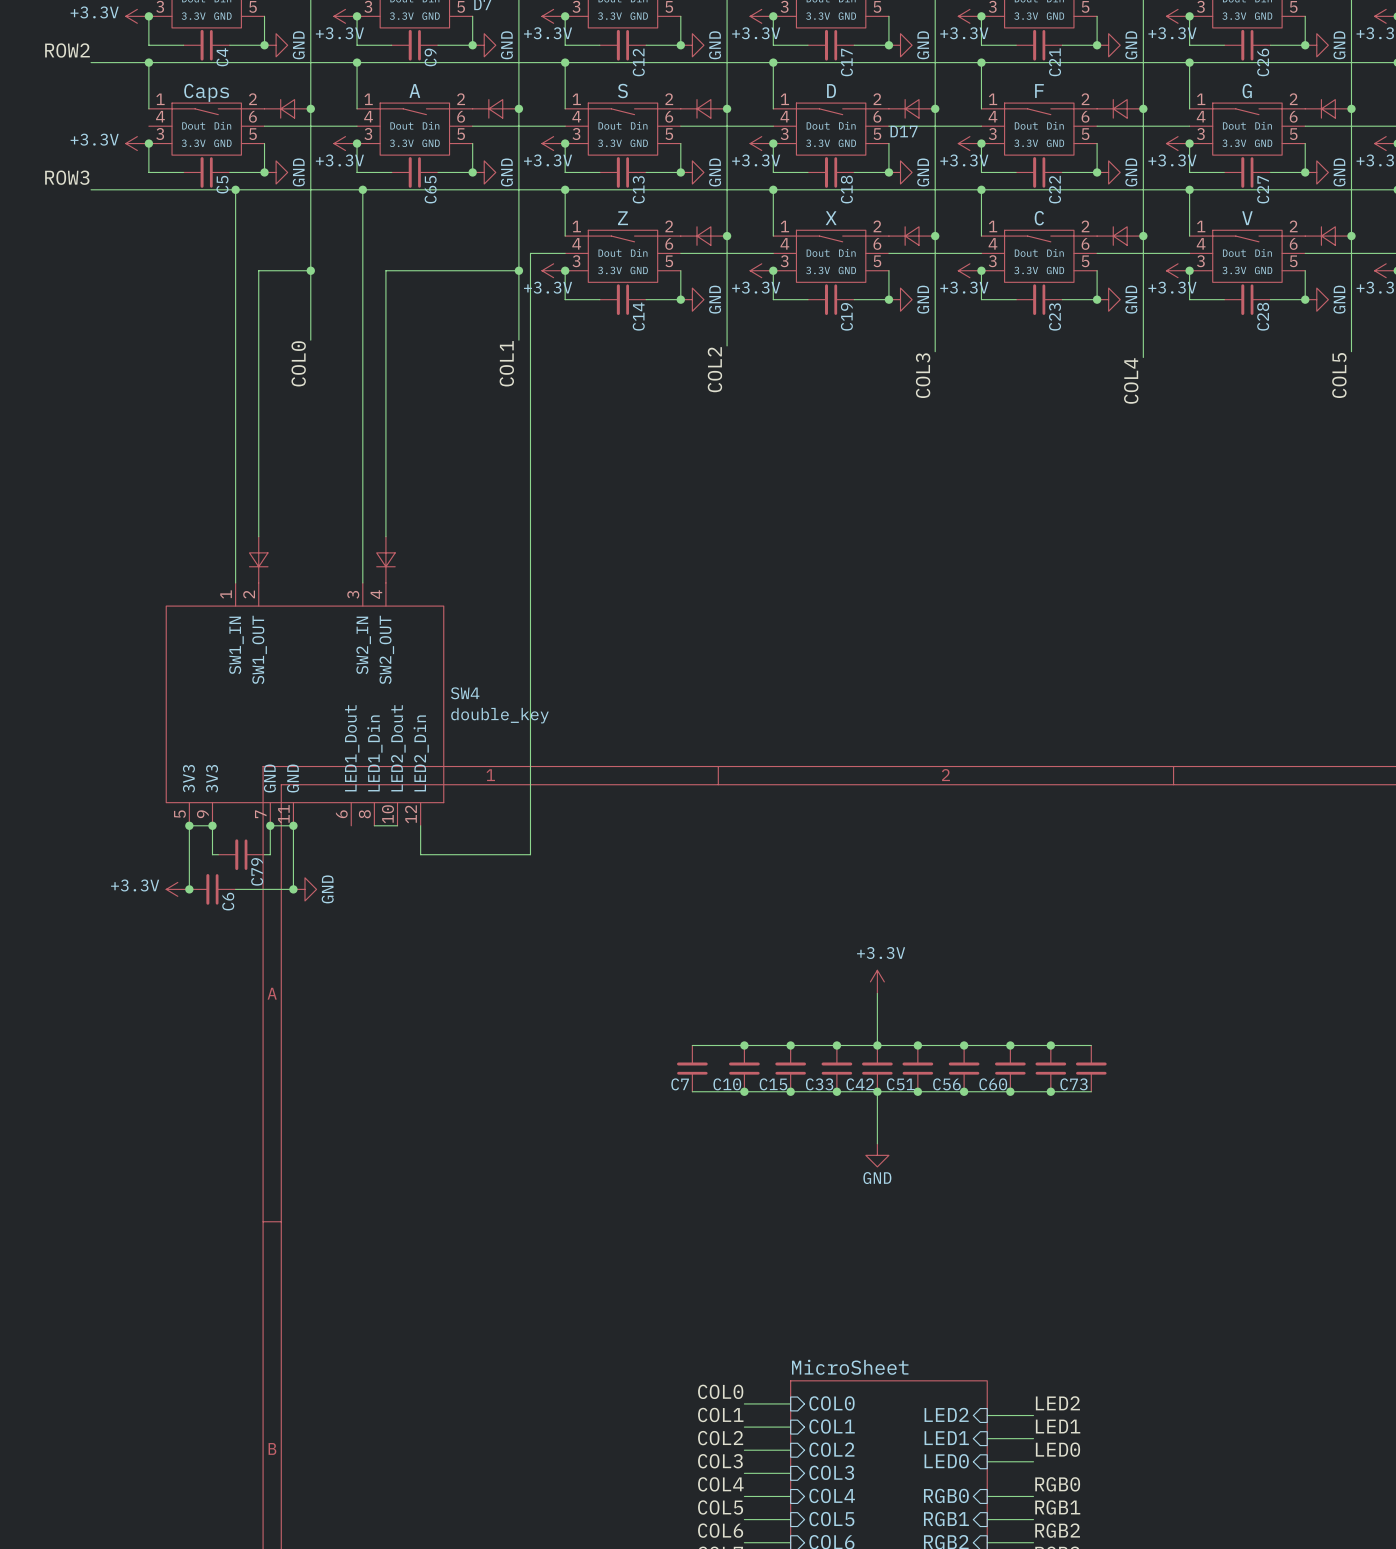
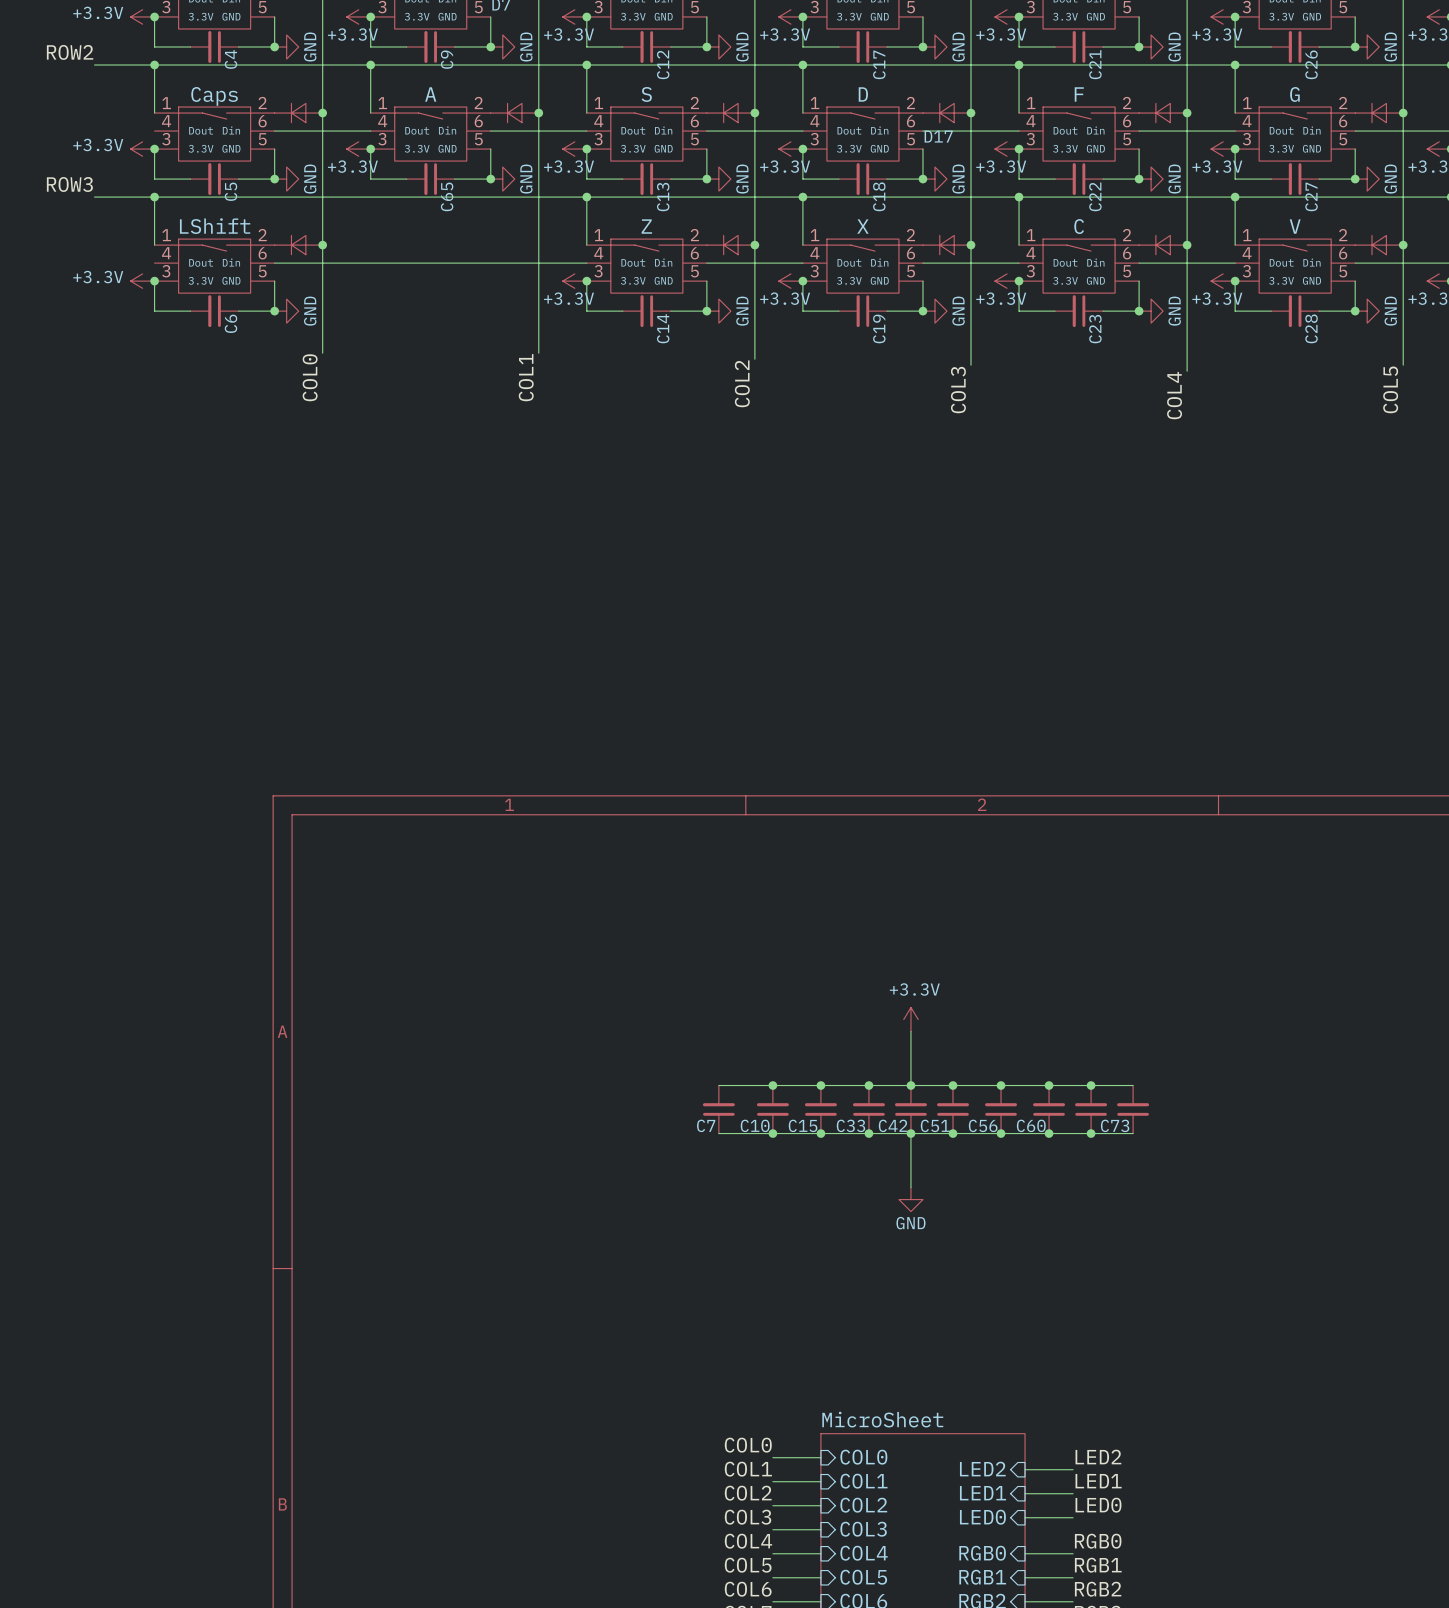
wire: none -> (154, 197) (154, 245)
junction: none -> (154, 197)
wire: (235, 189) (235, 582) -> none
junction: (235, 189) -> none
wire: (362, 189) (362, 582) -> none
junction: (362, 189) -> none
part: none -> (298, 245)
junction: none -> (322, 245)
wire: (530, 253) (530, 854) (420, 854) (420, 825) -> (550, 263) (274, 263)
part: none -> LShift (214, 266)
power symbol: none -> +3.3V (142, 281)
wire: none -> (154, 281) (154, 311) (190, 311)
junction: none -> (154, 281)
wire: none -> (274, 281) (274, 311) (238, 311)
wire: (310, 270) (258, 270) (258, 536) -> none
junction: (310, 270) -> none
wire: (518, 270) (385, 270) (385, 536) -> none
junction: (518, 270) -> none
junction: none -> (274, 311)
power symbol: none -> GND (286, 311)
part: (258, 559) -> none
part: (385, 559) -> none
SW4: double_key (304, 704) -> none
junction: (189, 825) -> none
junction: (212, 825) -> none
junction: (270, 825) -> none
junction: (293, 825) -> none
wire: (374, 825) (397, 825) -> none
wire: (218, 854) (212, 854) (212, 825) (189, 825) (189, 889) -> none
C79: (241, 854) -> none
wire: (264, 854) (270, 854) (270, 825) (293, 825) (293, 889) (235, 889) -> none
power symbol: +3.3V (177, 889) -> none
junction: (189, 889) -> none
C6 position: (212, 889) -> (214, 311)
junction: (293, 889) -> none
power symbol: GND (304, 889) -> none

